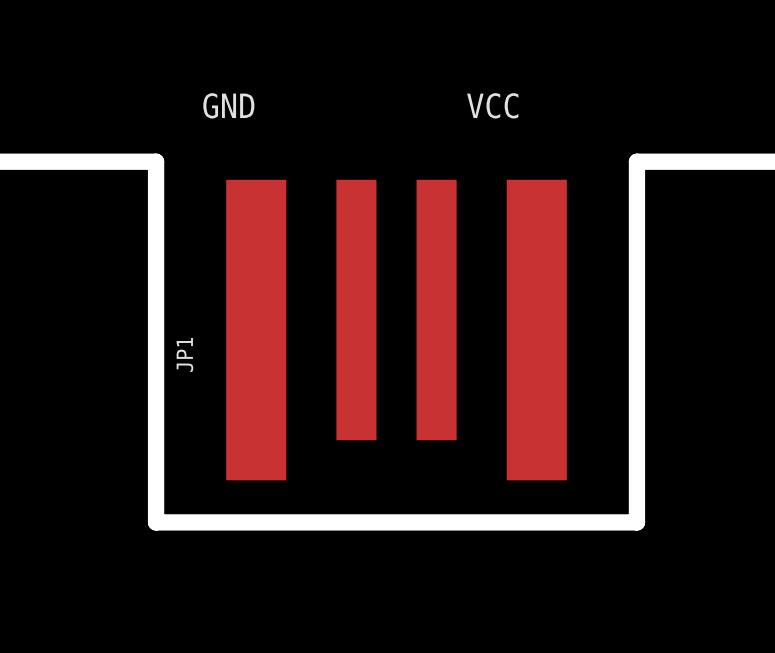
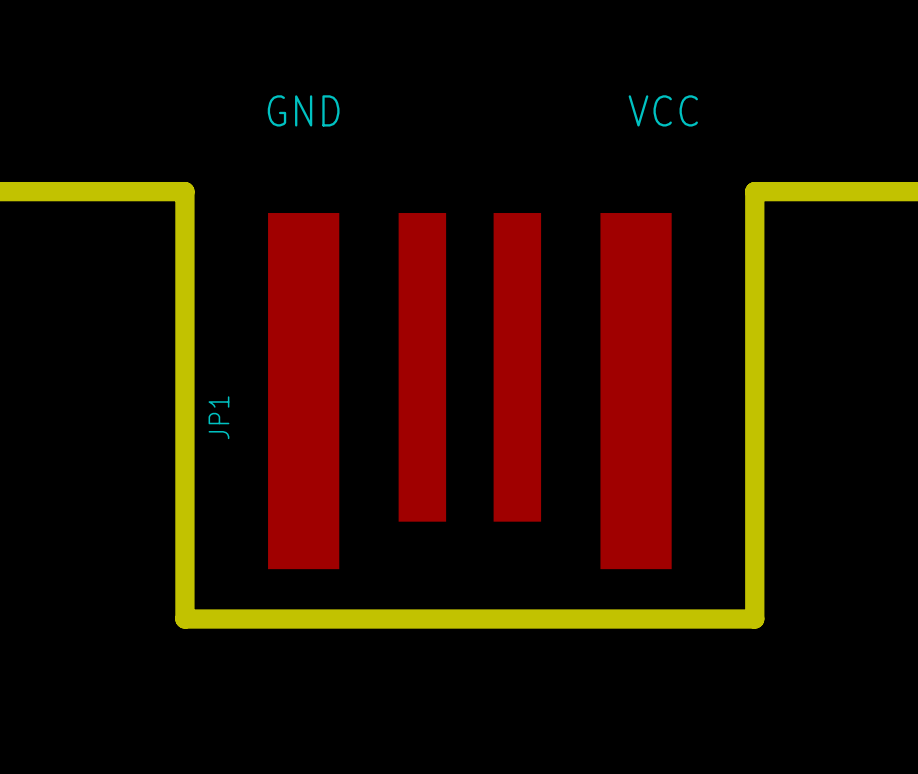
text position: GND (228, 105) -> GND (303, 110)
text position: VCC (492, 105) -> VCC (663, 110)

